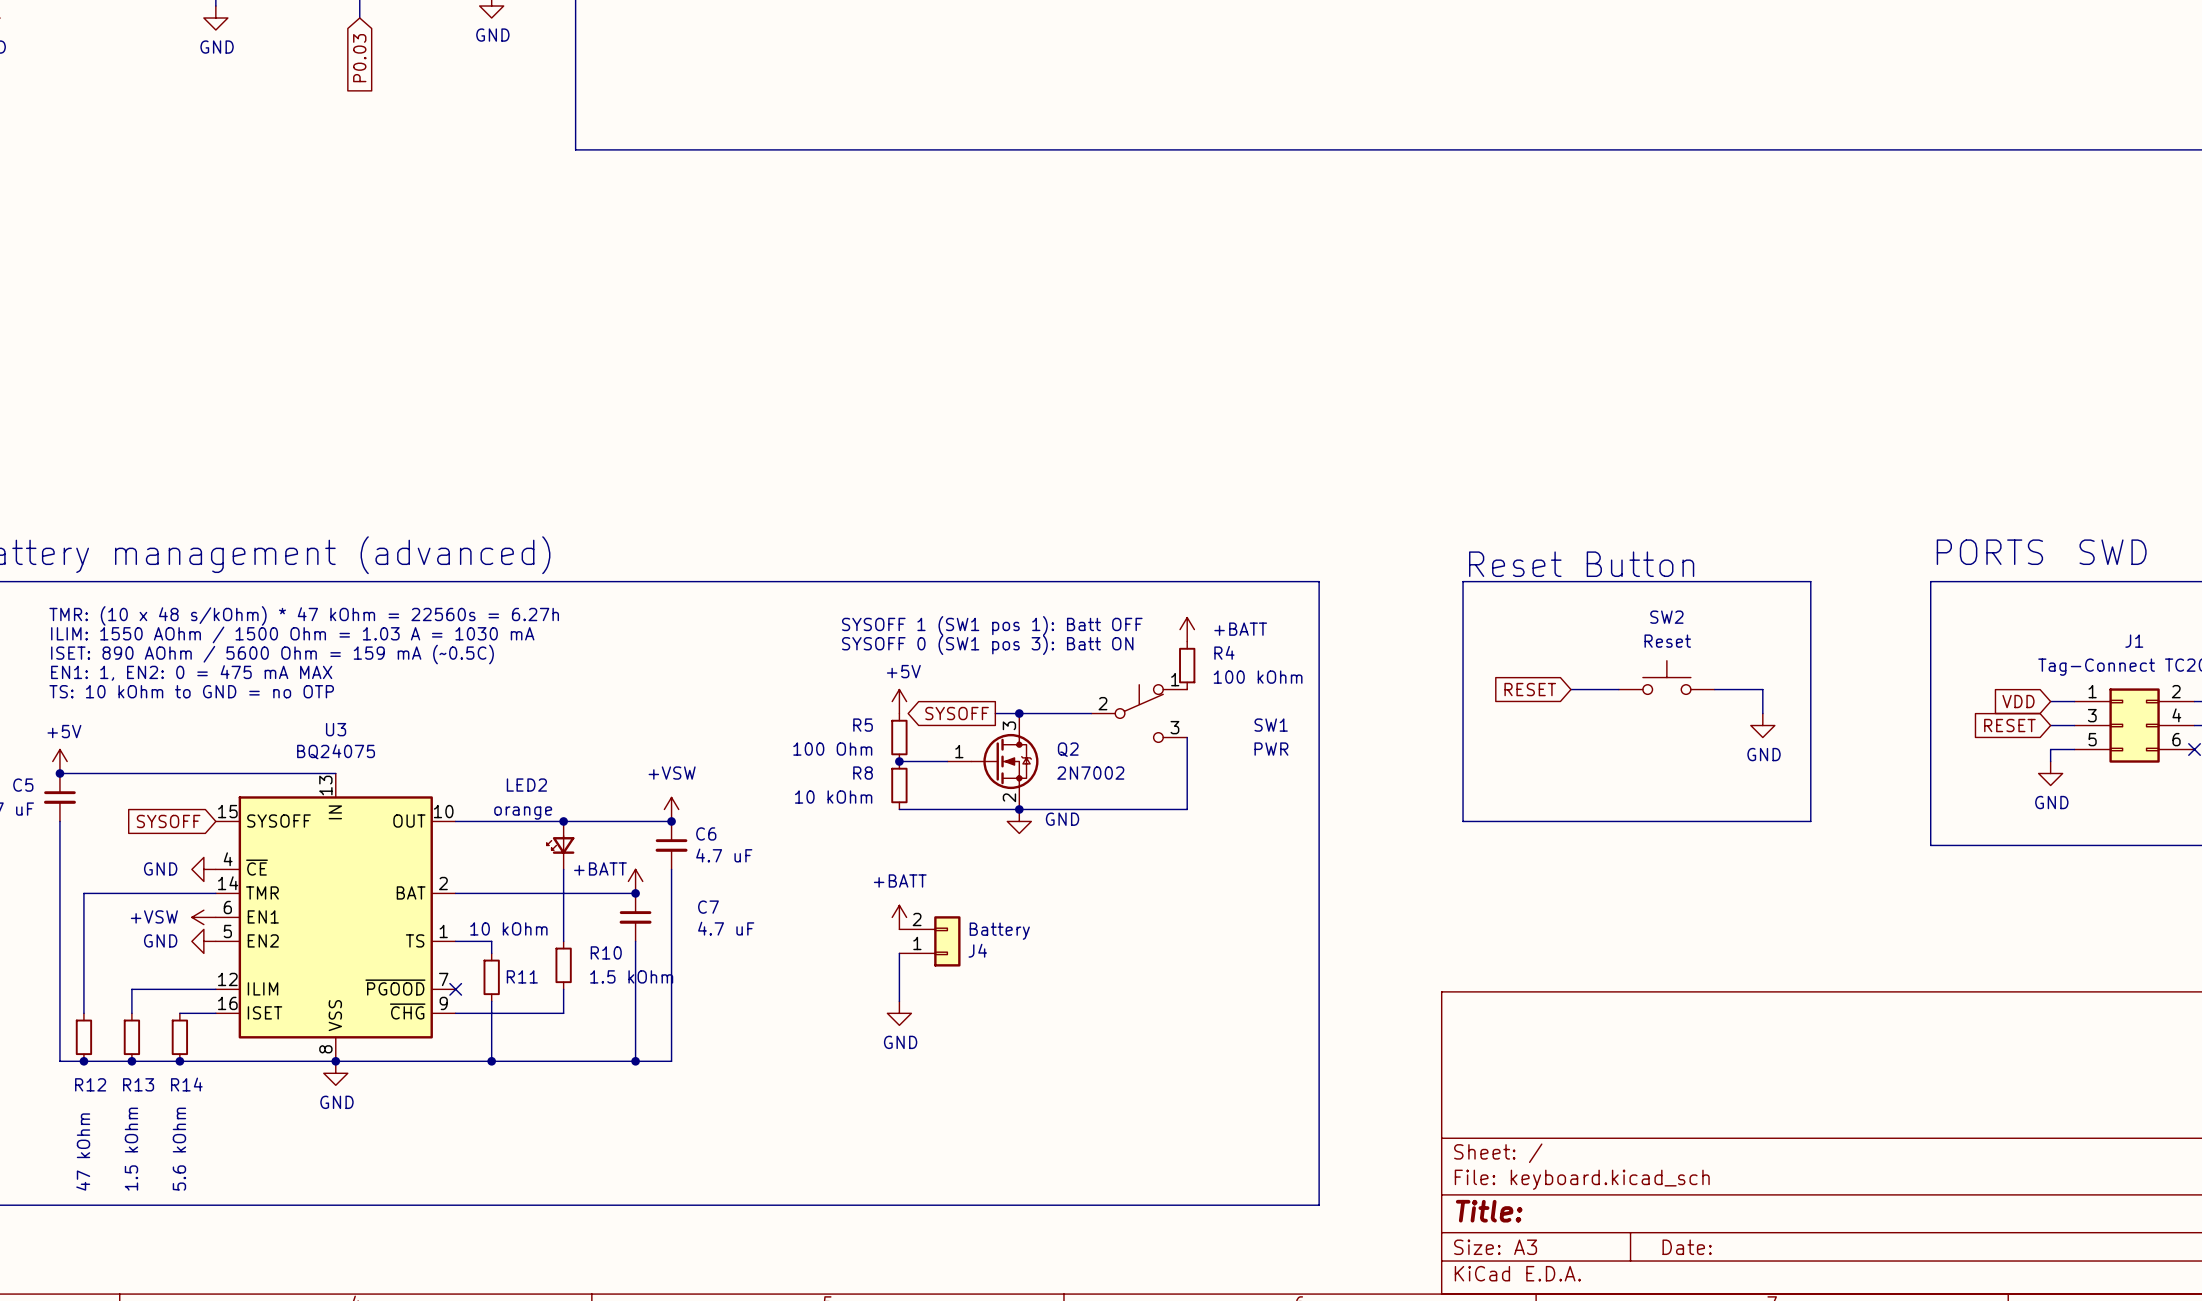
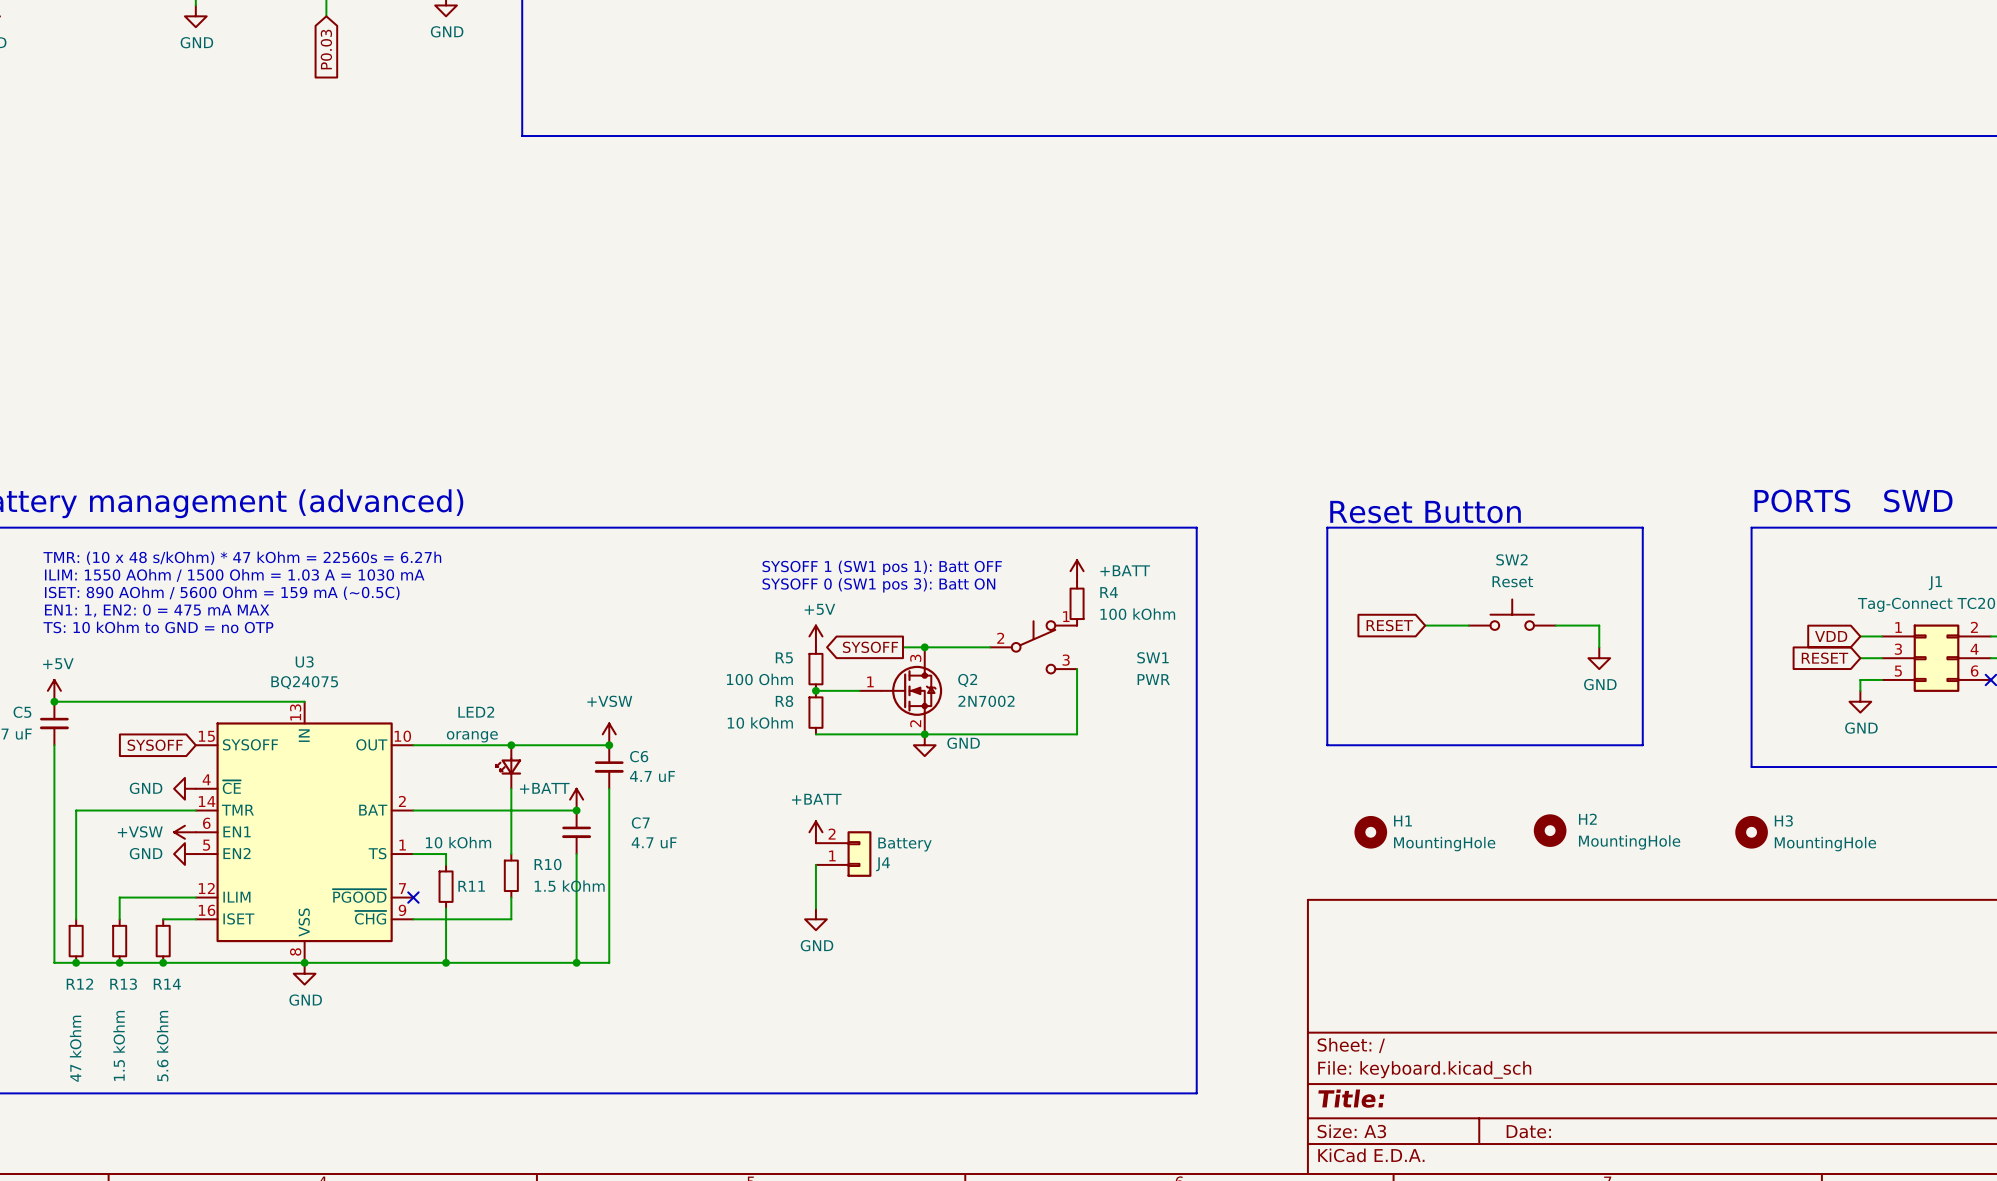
H2: none -> MountingHole (1550, 830)
H1: none -> MountingHole (1370, 832)
H3: none -> MountingHole (1751, 832)

